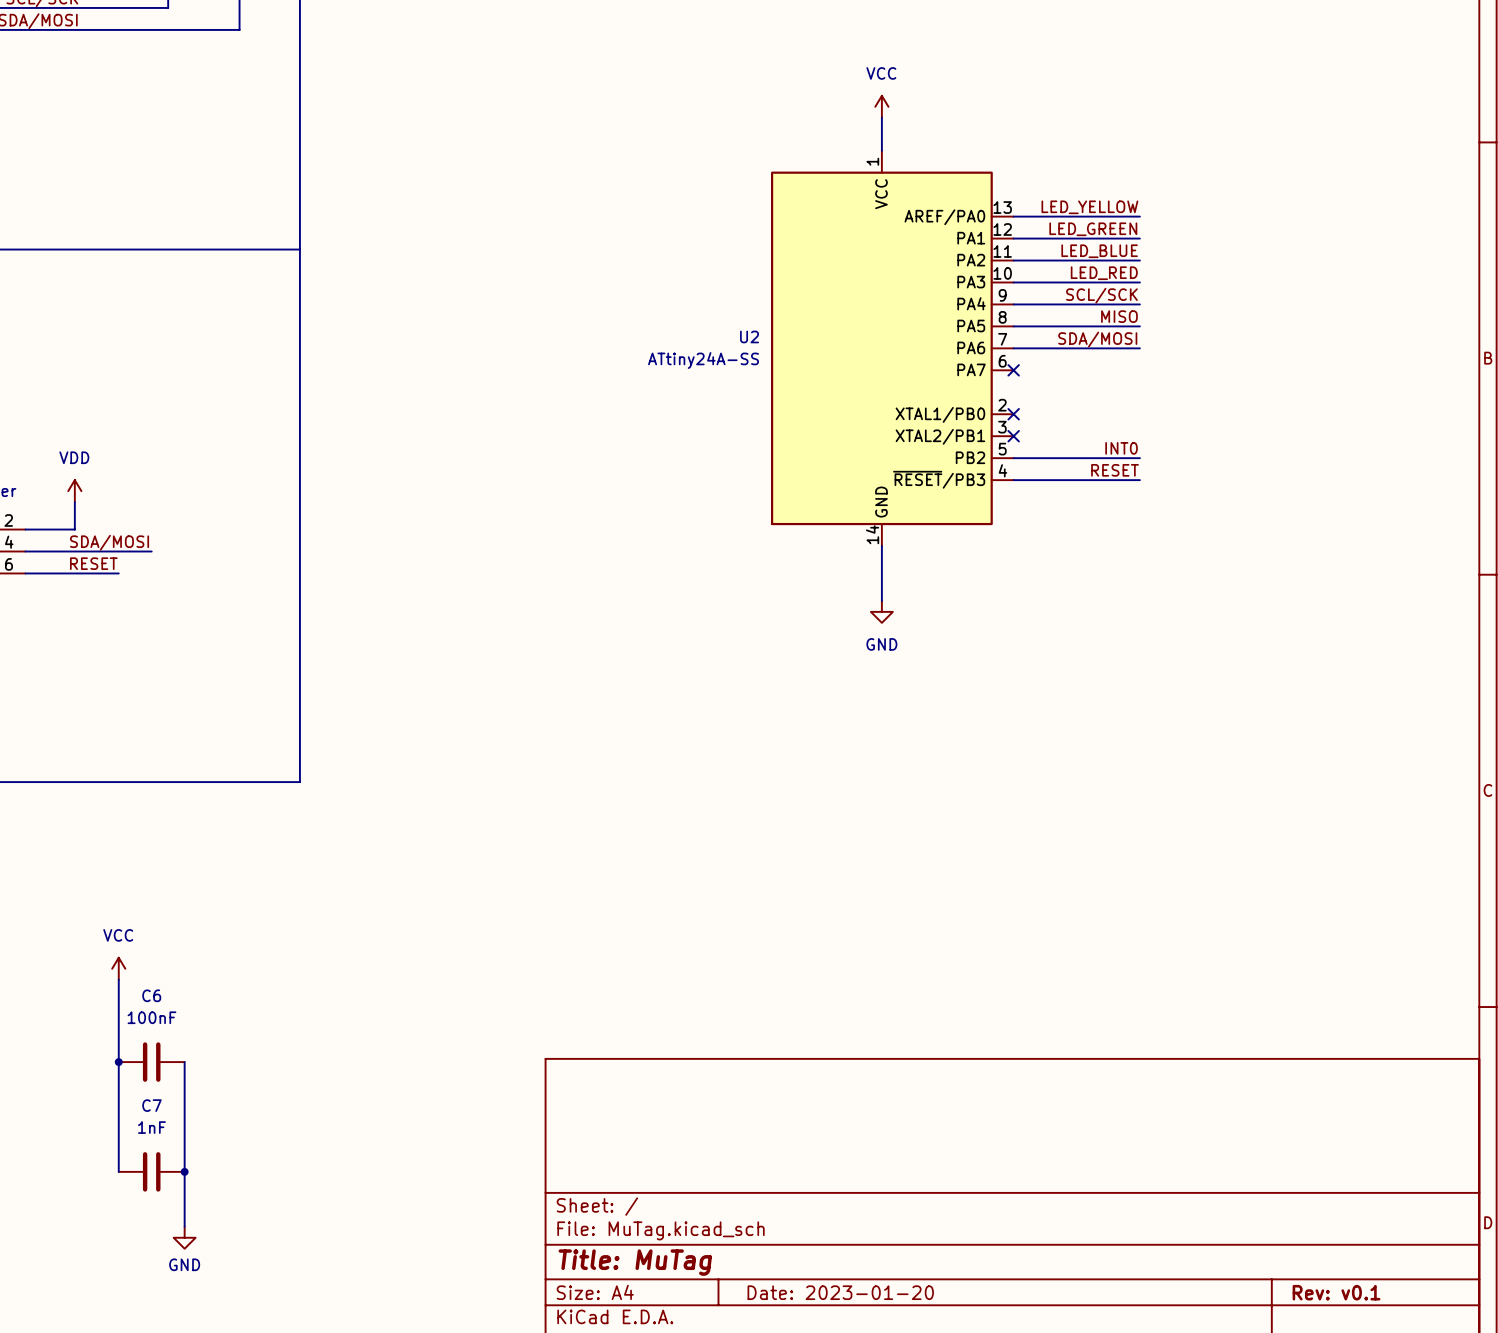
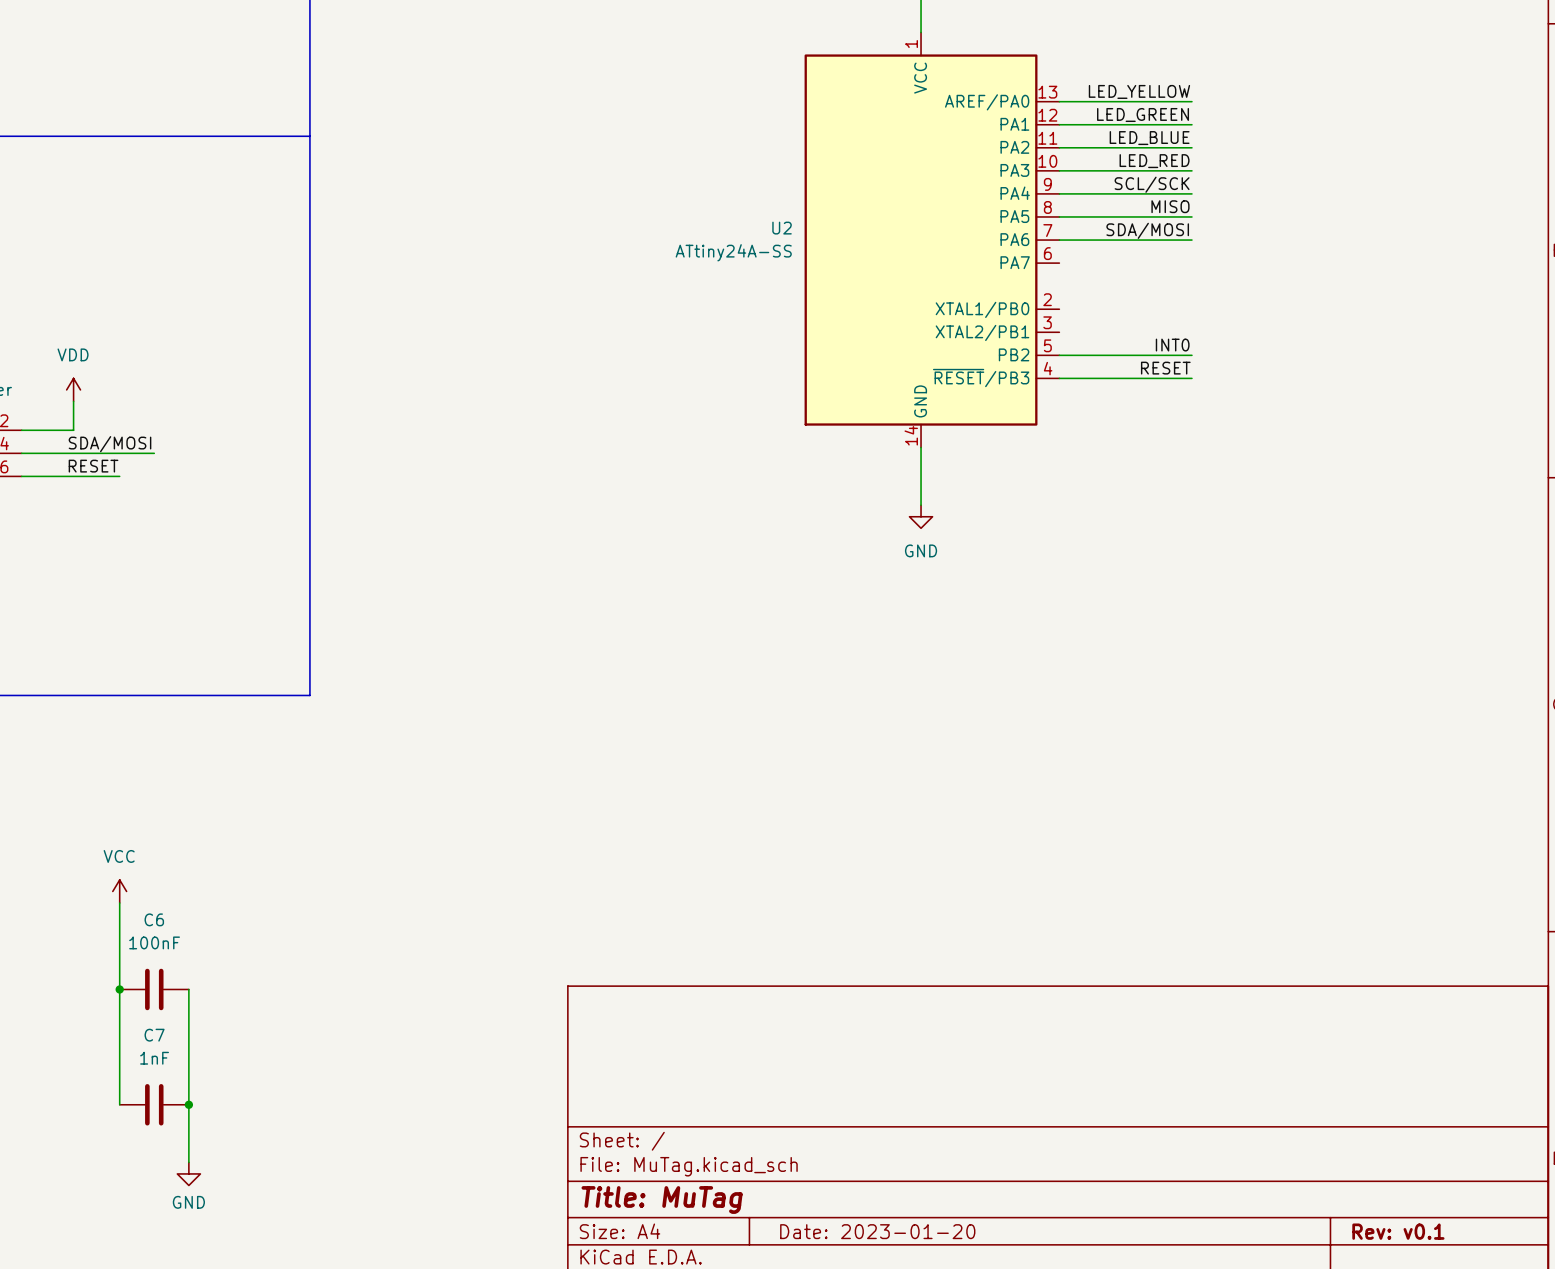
no-connect mark: (1013, 370) -> none
no-connect mark: (1013, 414) -> none
no-connect mark: (1013, 436) -> none

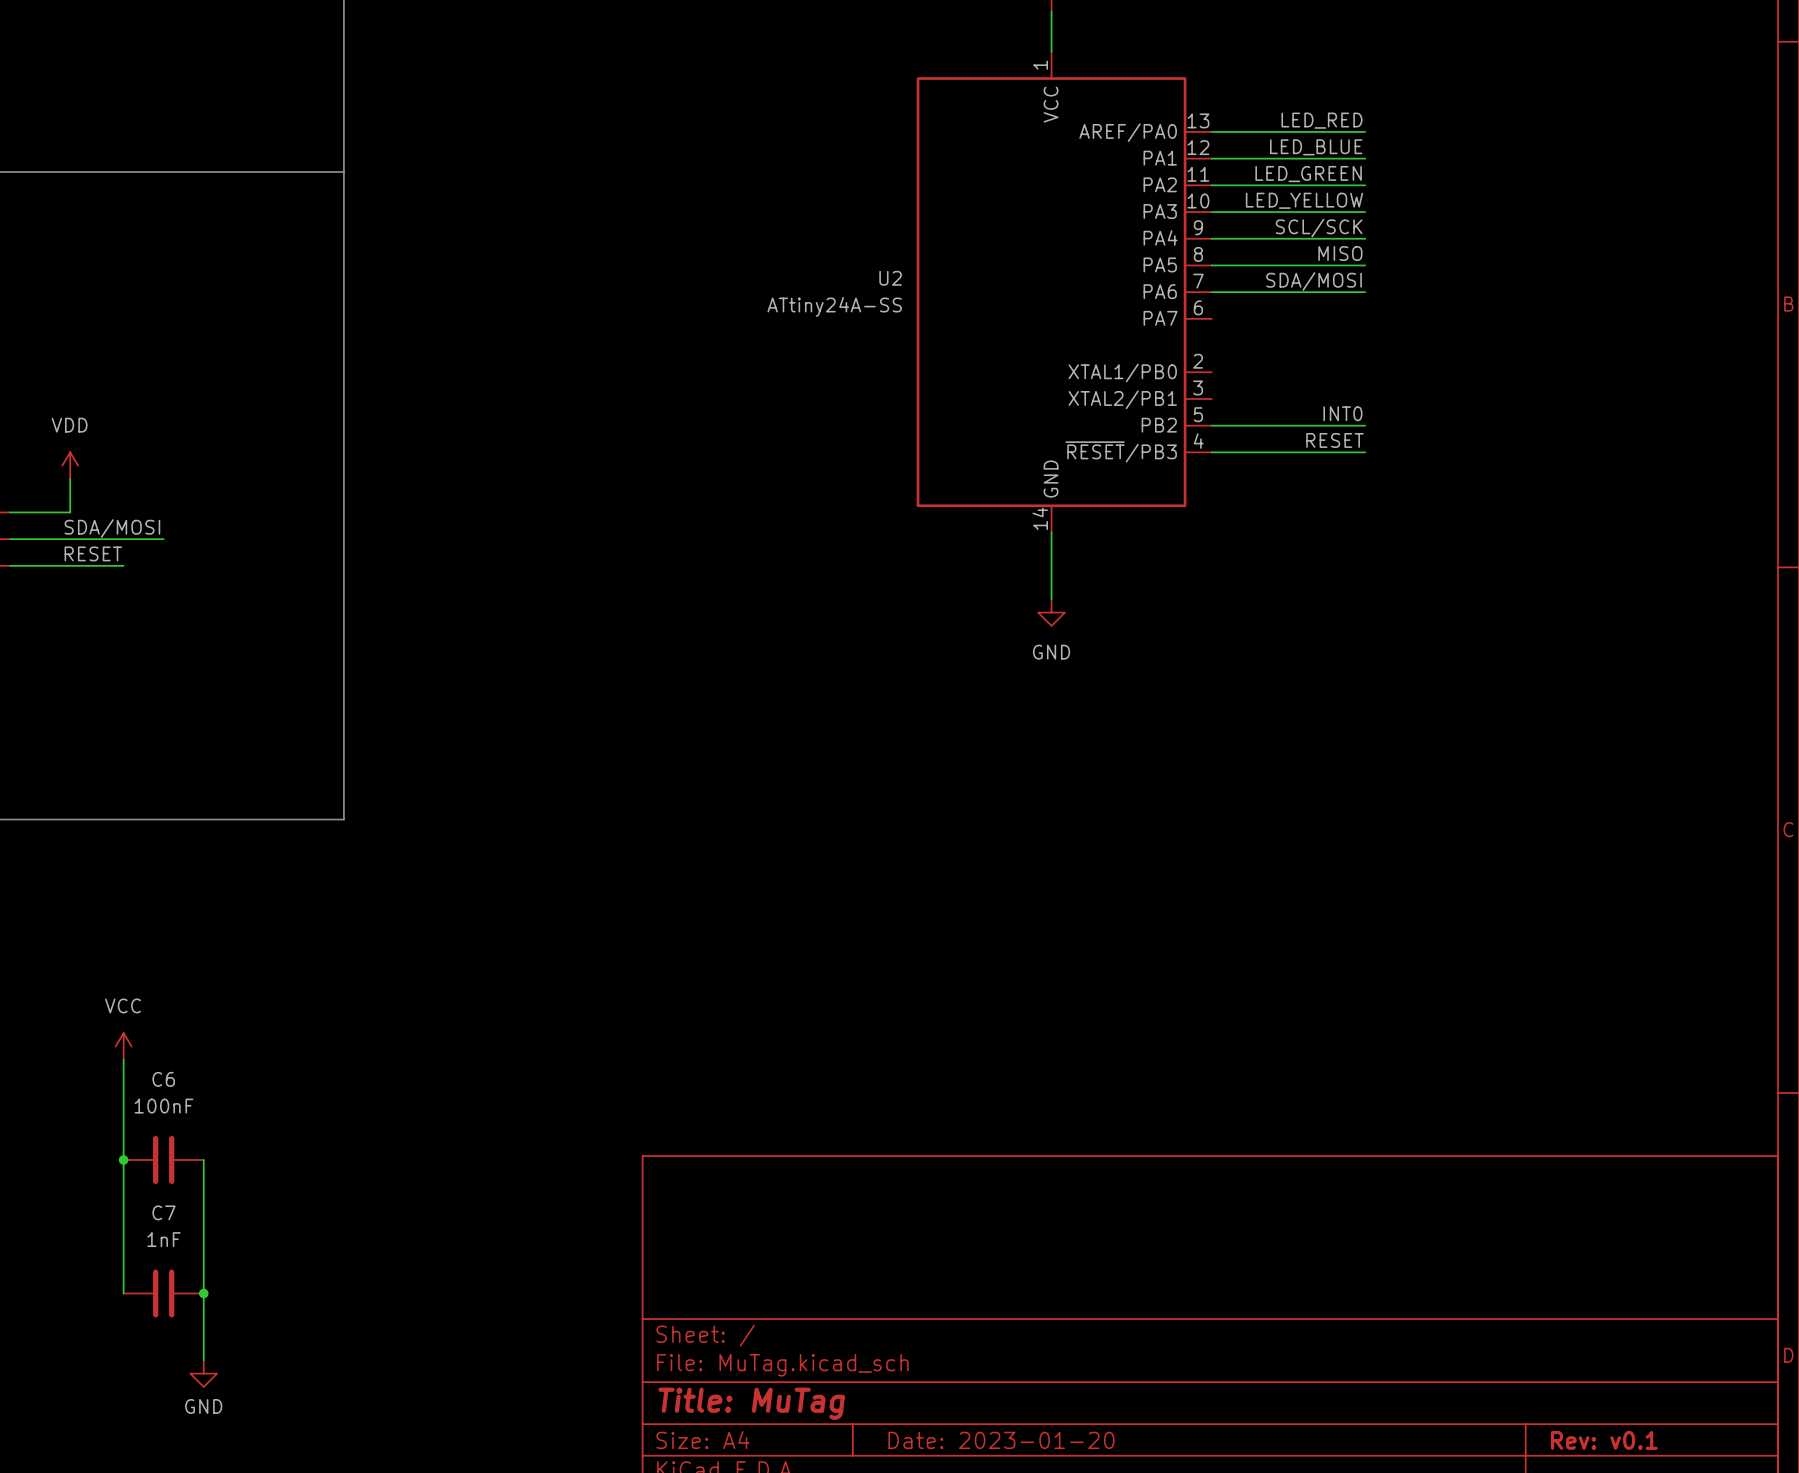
label: LED_YELLOW (1139, 91) -> LED_RED (1321, 120)
label: LED_GREEN (1143, 115) -> LED_BLUE (1316, 147)
label: LED_BLUE (1149, 138) -> LED_GREEN (1308, 174)
label: LED_RED (1154, 161) -> LED_YELLOW (1304, 200)

